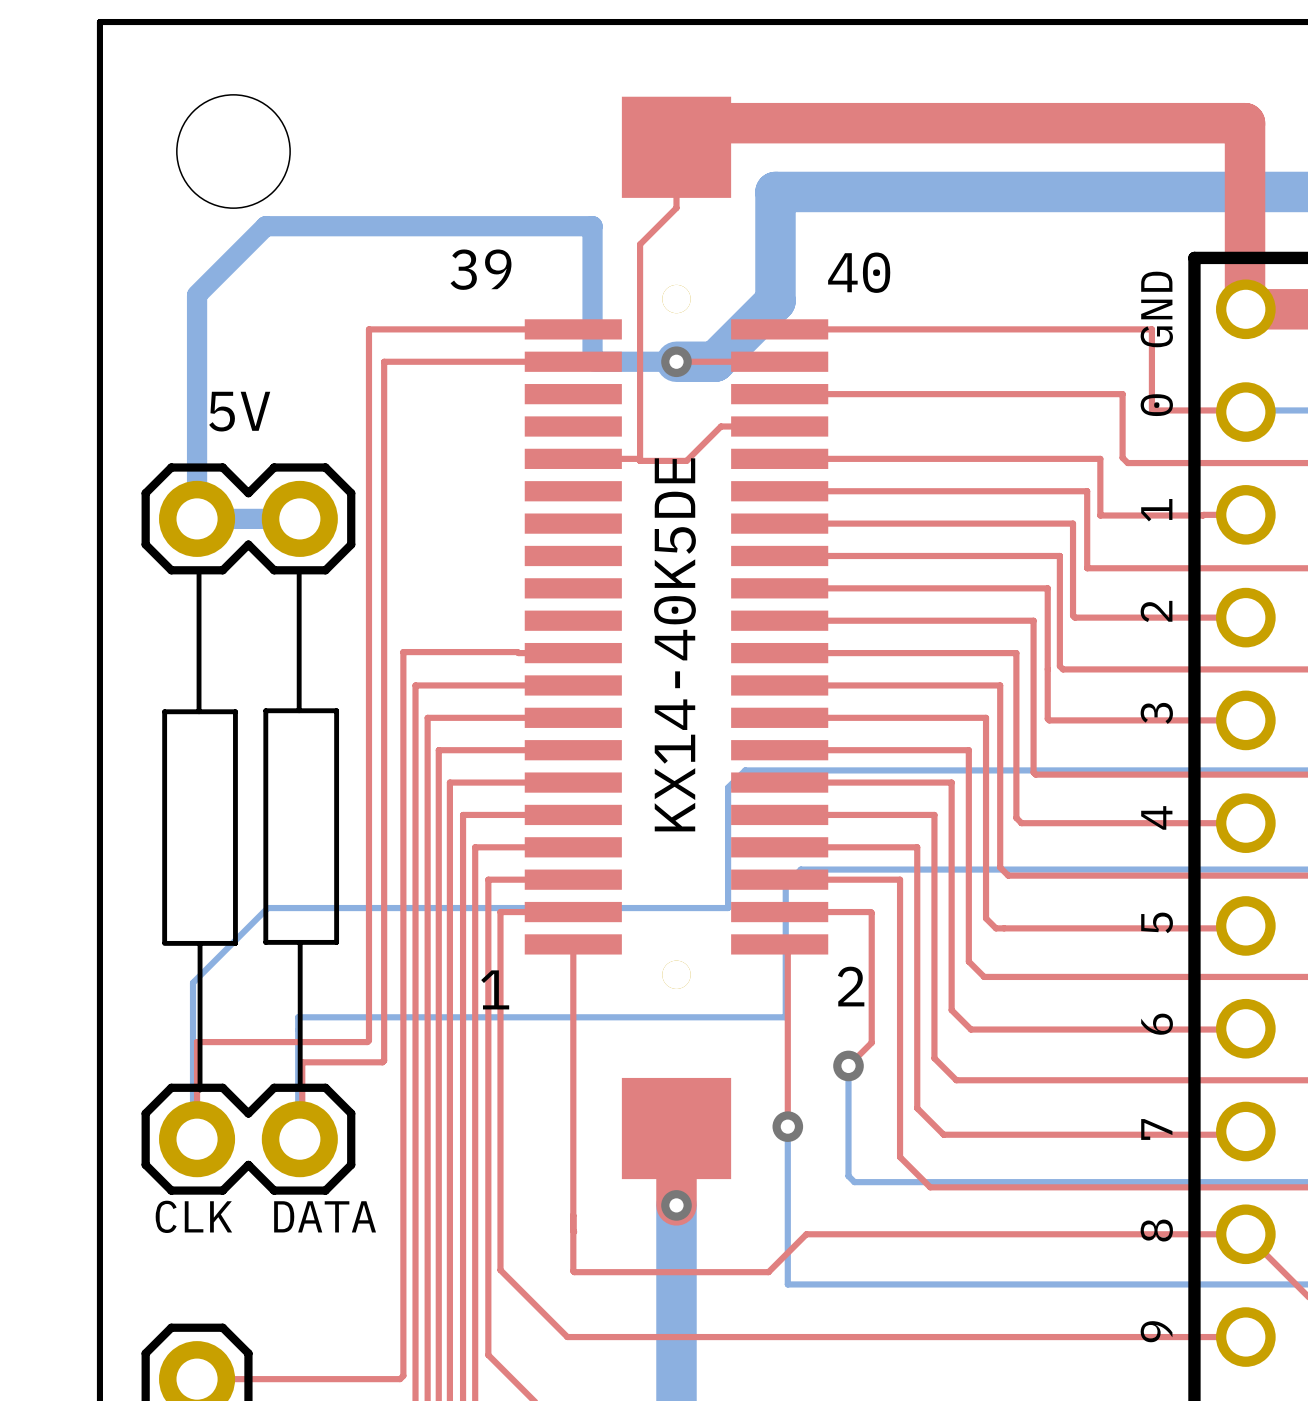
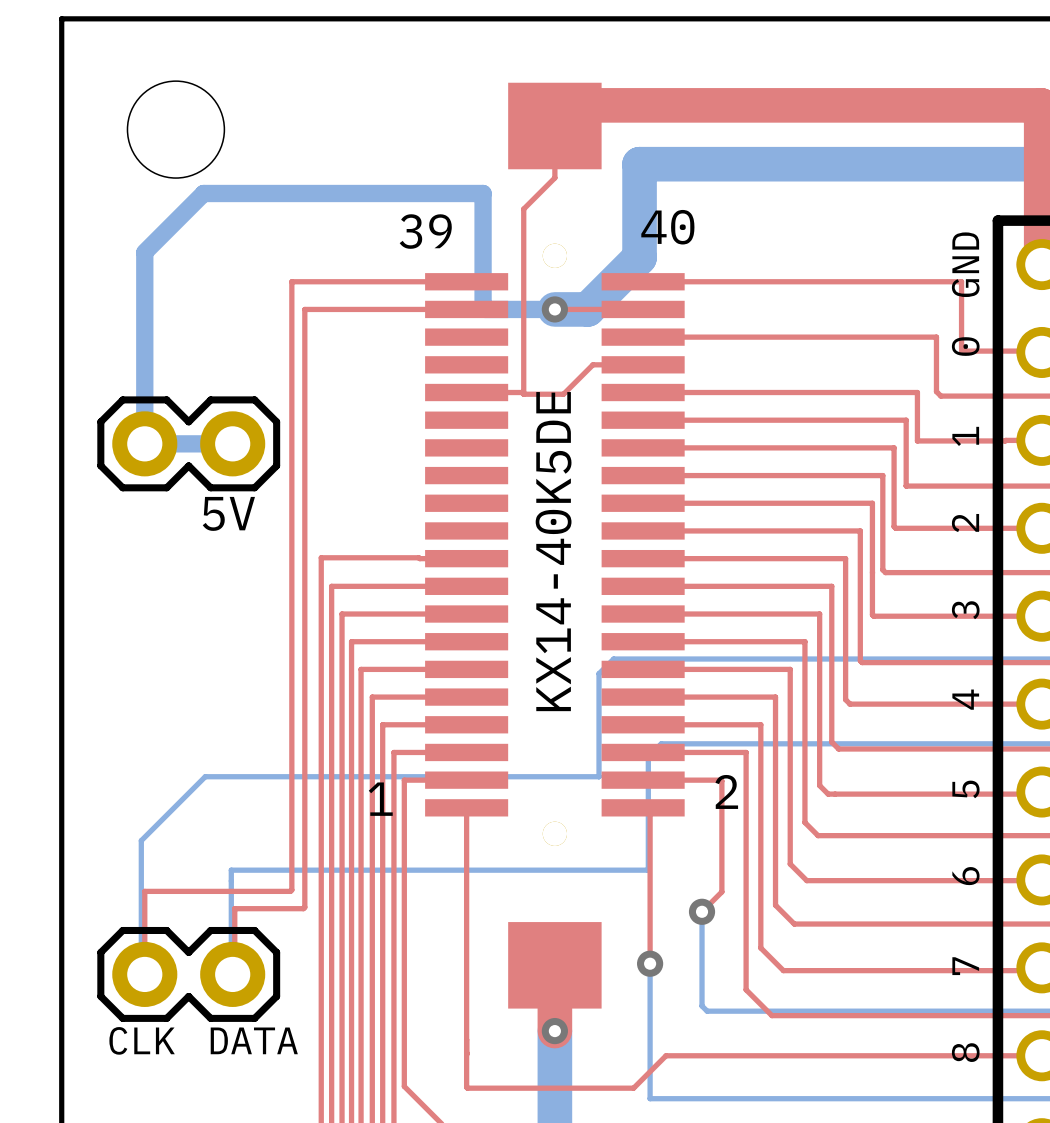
text position: 39 (481, 269) -> 39 (425, 231)
text position: 40 (859, 272) -> 40 (667, 227)
text position: 5V (239, 411) -> 5V (228, 513)
line: (199, 570) (199, 711) -> none
line: (299, 570) (299, 710) -> none
line: (265, 710) (265, 942) (336, 942) (336, 710) (265, 710) -> none
line: (164, 942) (164, 711) (235, 711) (235, 943) (164, 943) -> none
line: (200, 943) (200, 1090) -> none
line: (300, 943) (300, 1087) -> none
text position: 2 (851, 986) -> 2 (726, 791)
text position: 1 (495, 989) -> 1 (380, 799)

